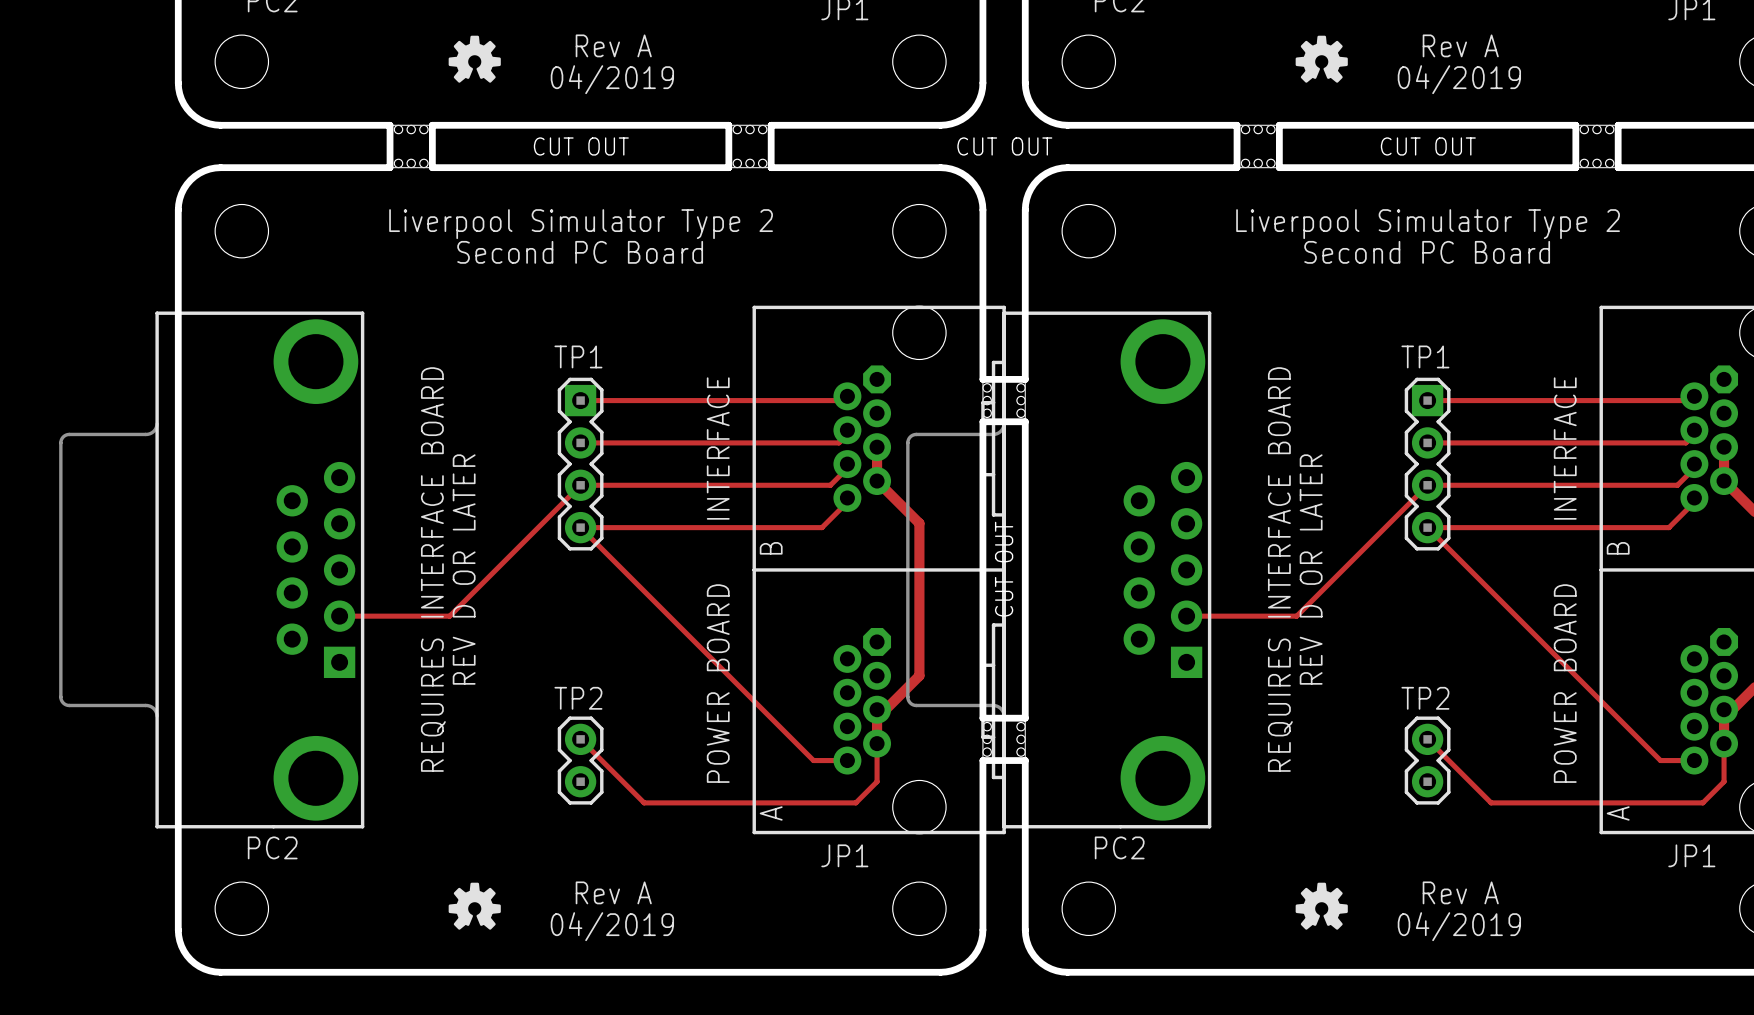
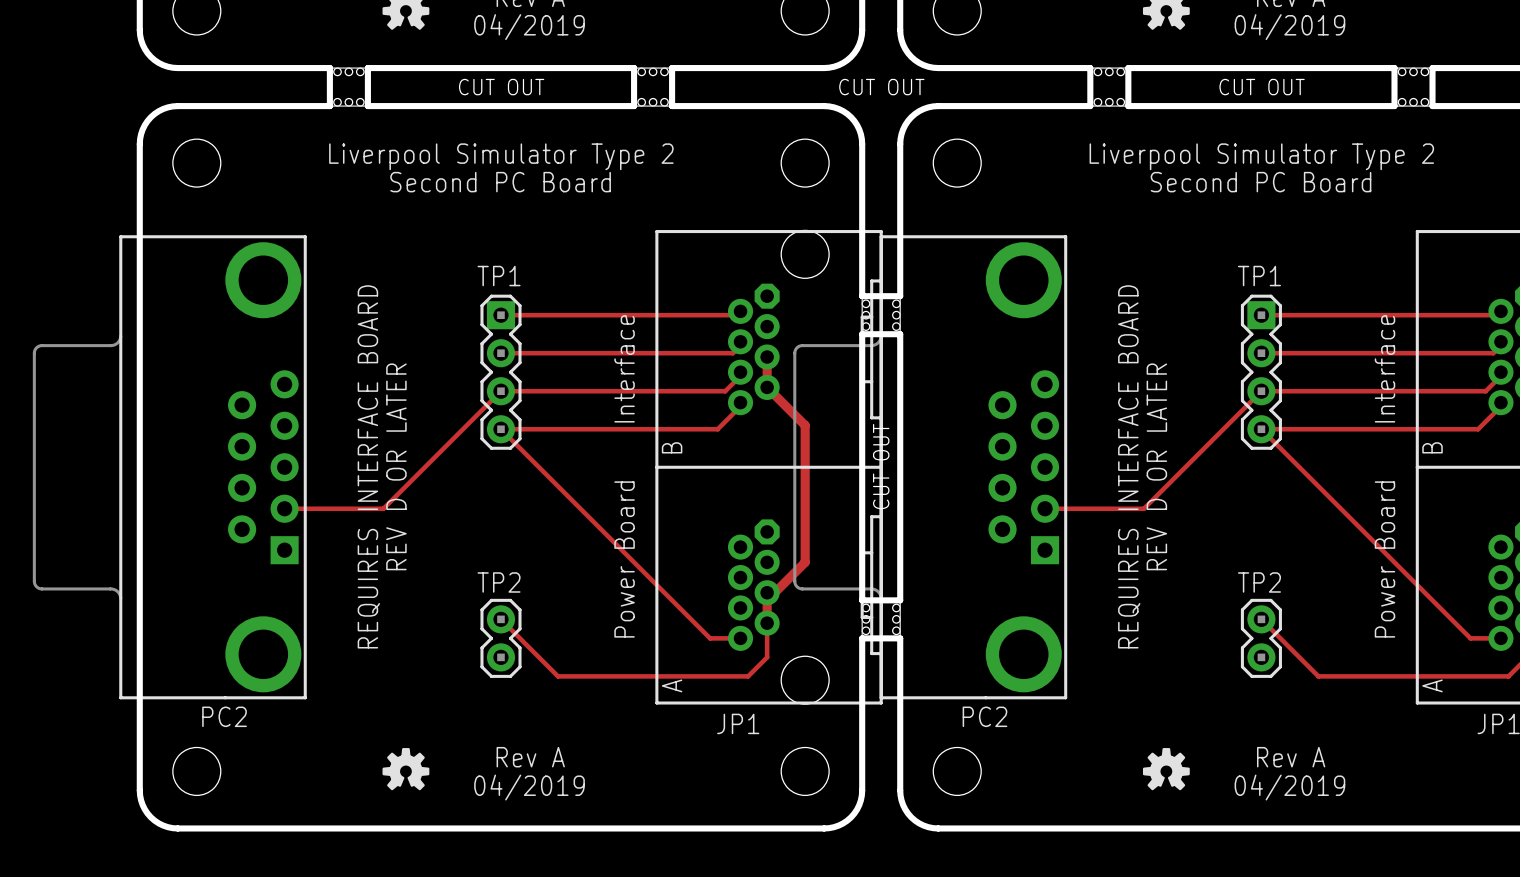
text: POWER BOARD INTERFACE (718, 580) -> Power Board Interface (624, 476)
text: POWER BOARD INTERFACE (1565, 580) -> Power Board Interface (1384, 476)

